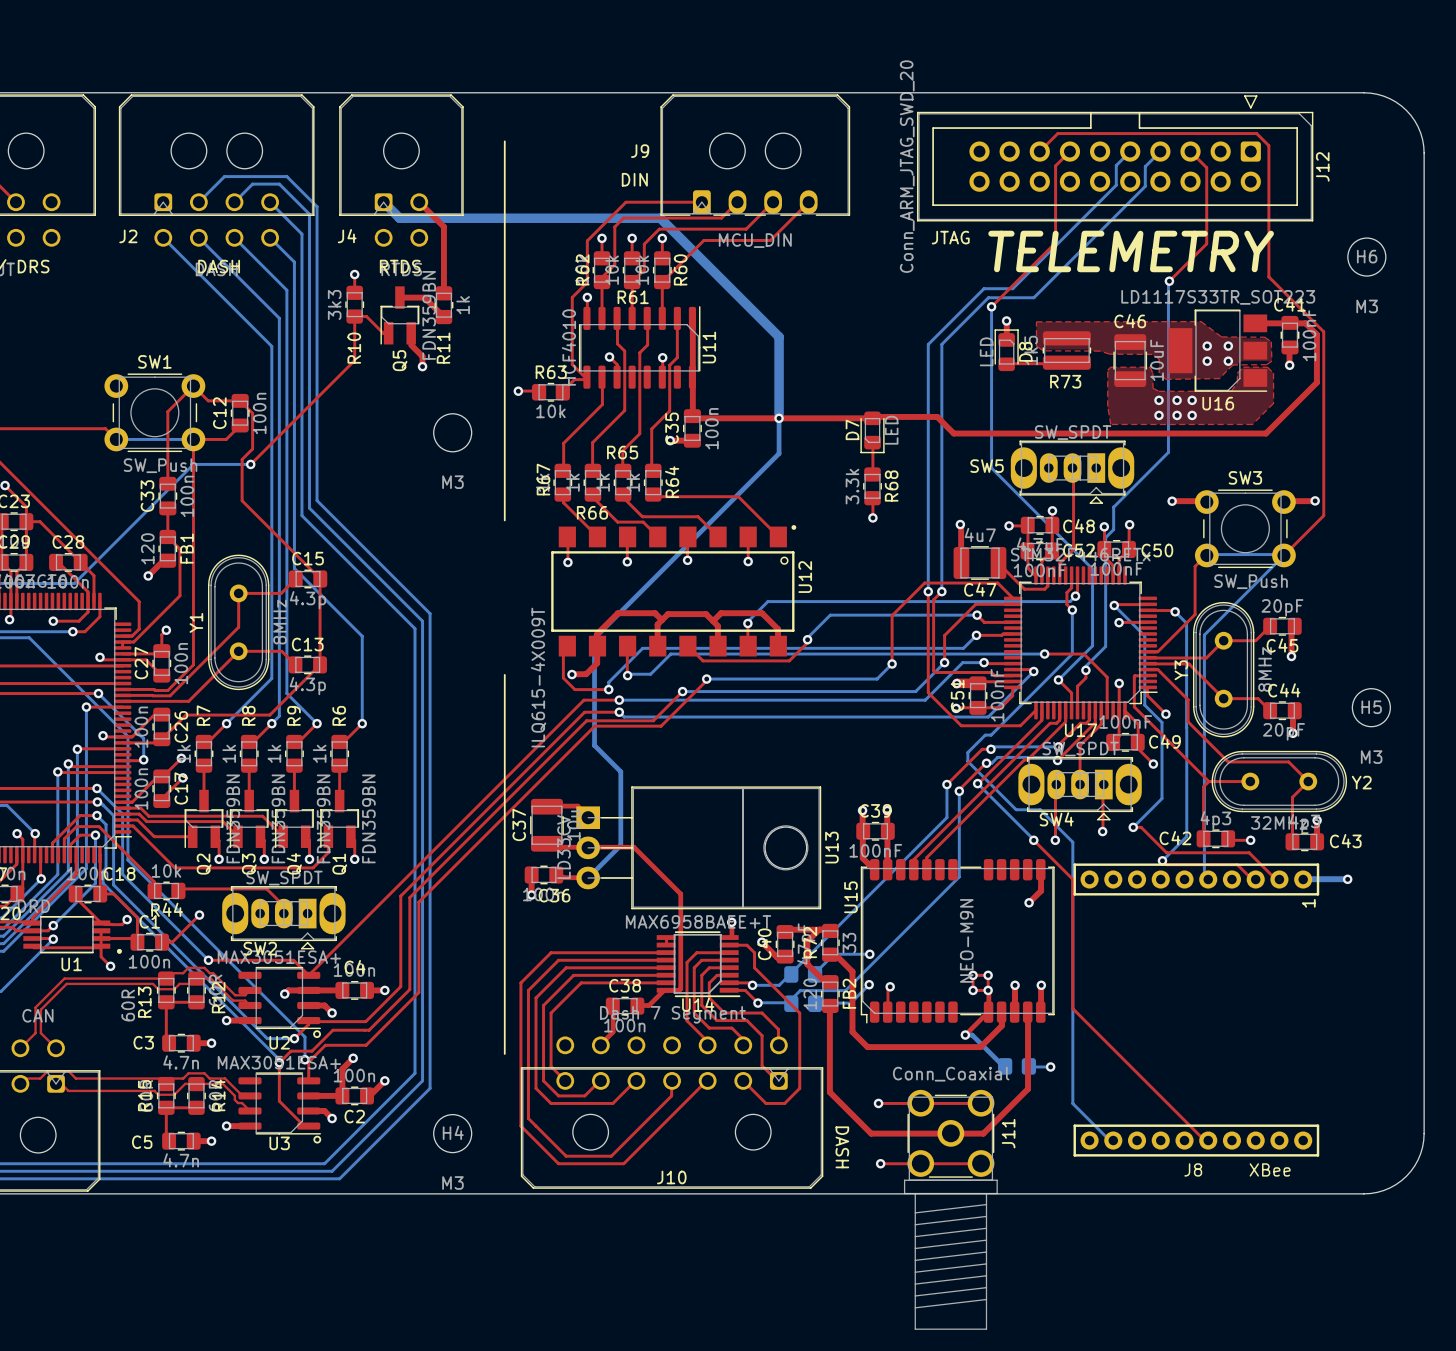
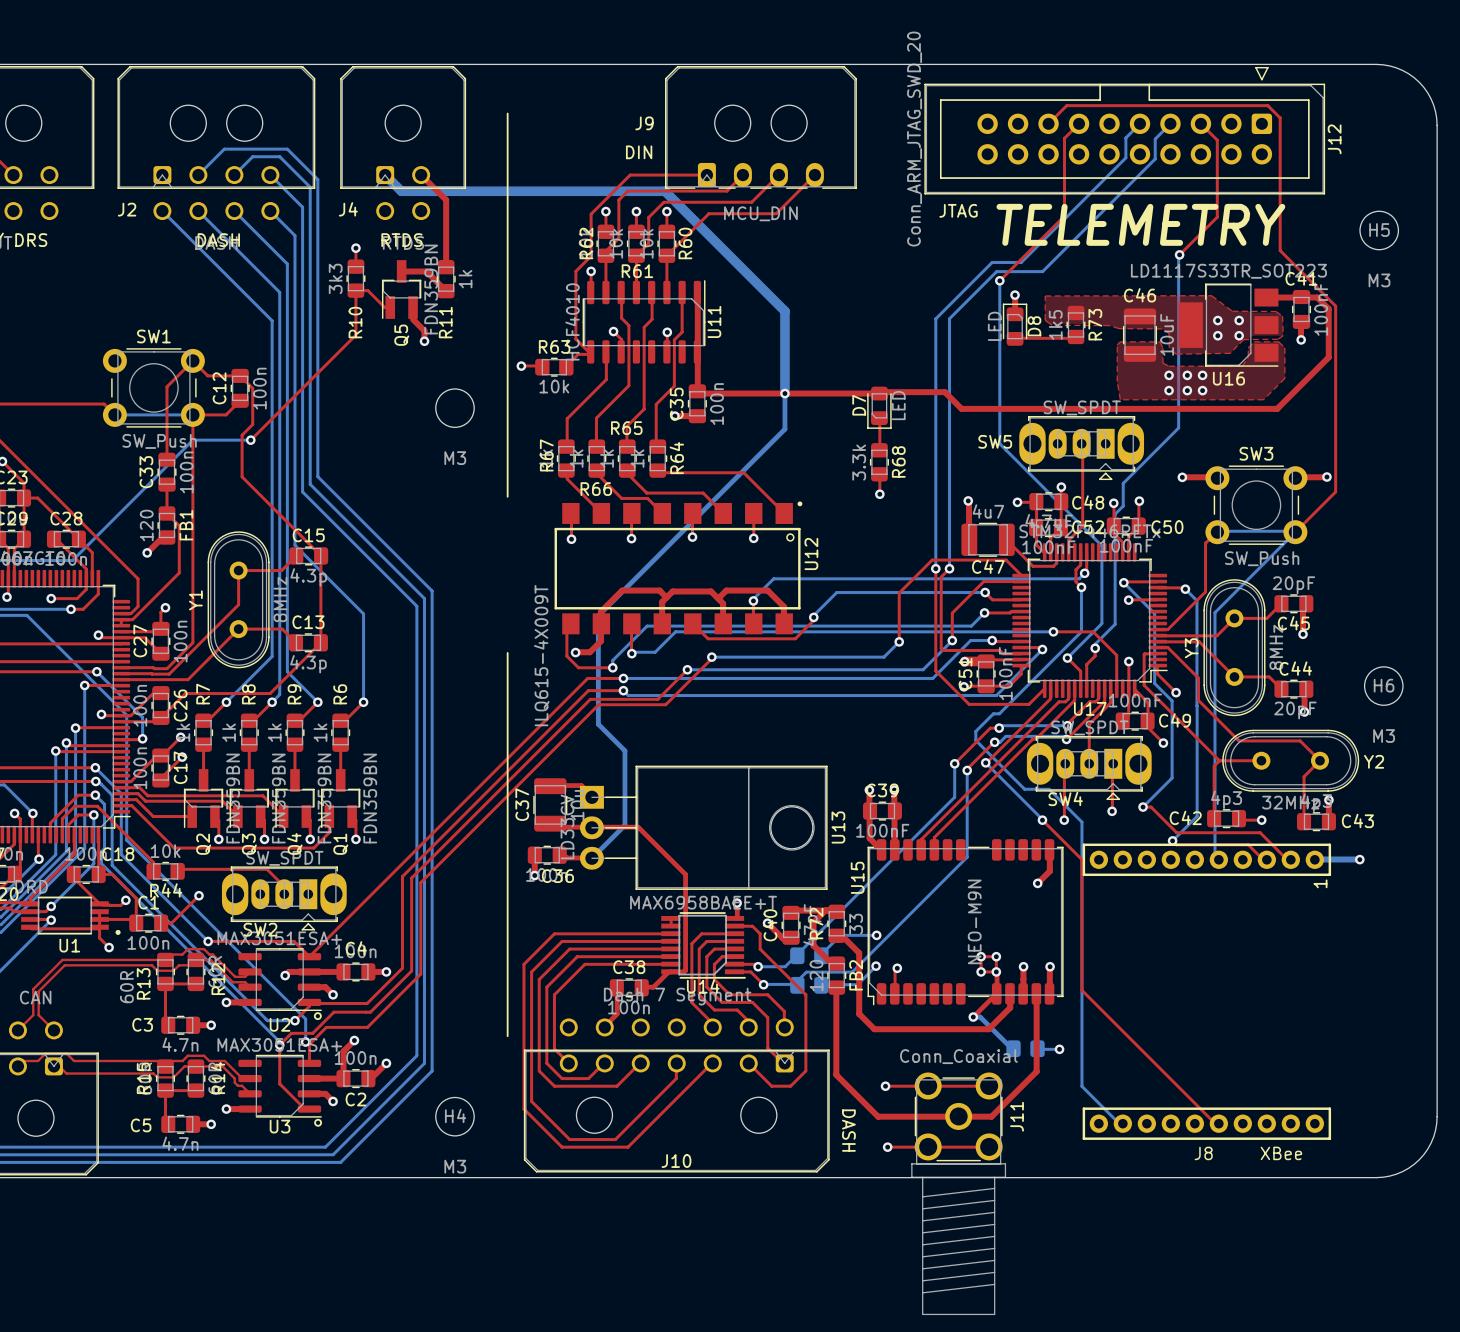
H6 name: H6 (1367, 256) -> H5 (1379, 230)
R73 footprint: [1042, 331, 1092, 370] -> [1066, 305, 1086, 345]
R73 name position: R73 (1065, 381) -> R73 (1095, 324)
H5 name: H5 (1371, 707) -> H6 (1384, 685)

